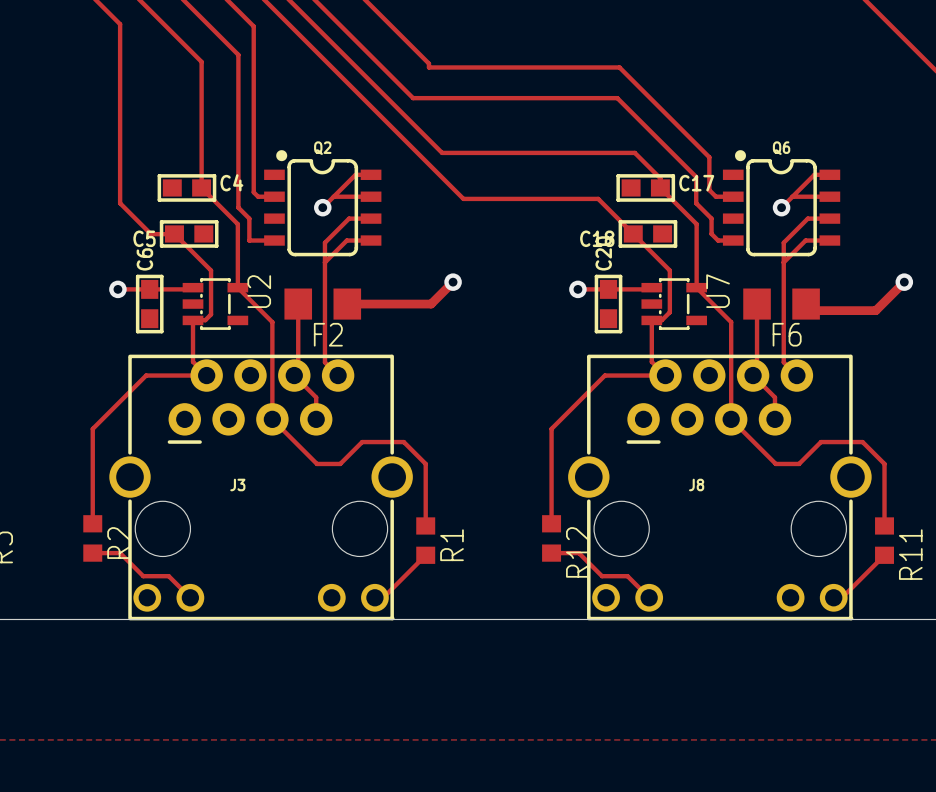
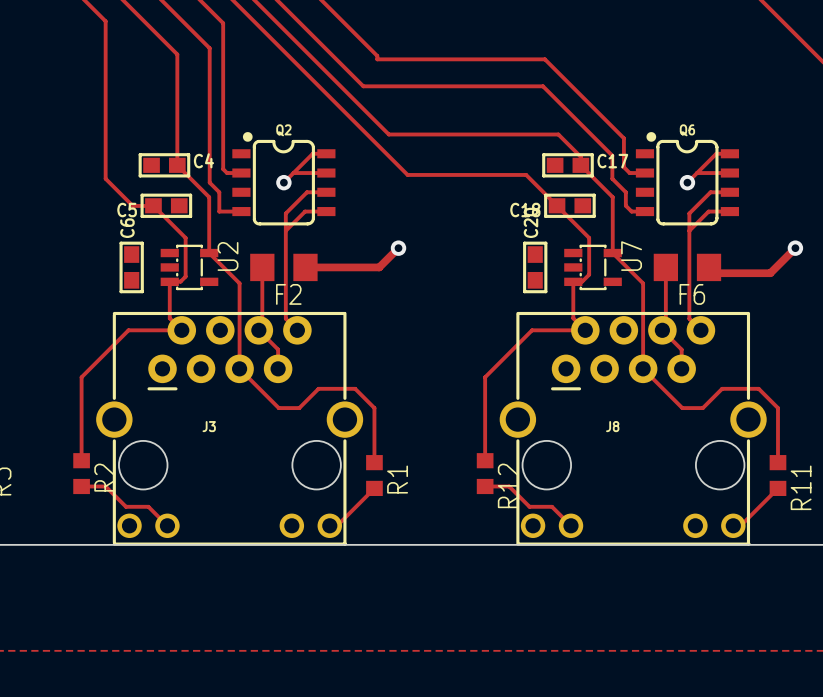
track: (193, 287) (191, 289) (117, 289) -> none
track: (651, 287) (650, 289) (577, 289) -> none
via: (117, 289) -> none
via: (577, 289) -> none

